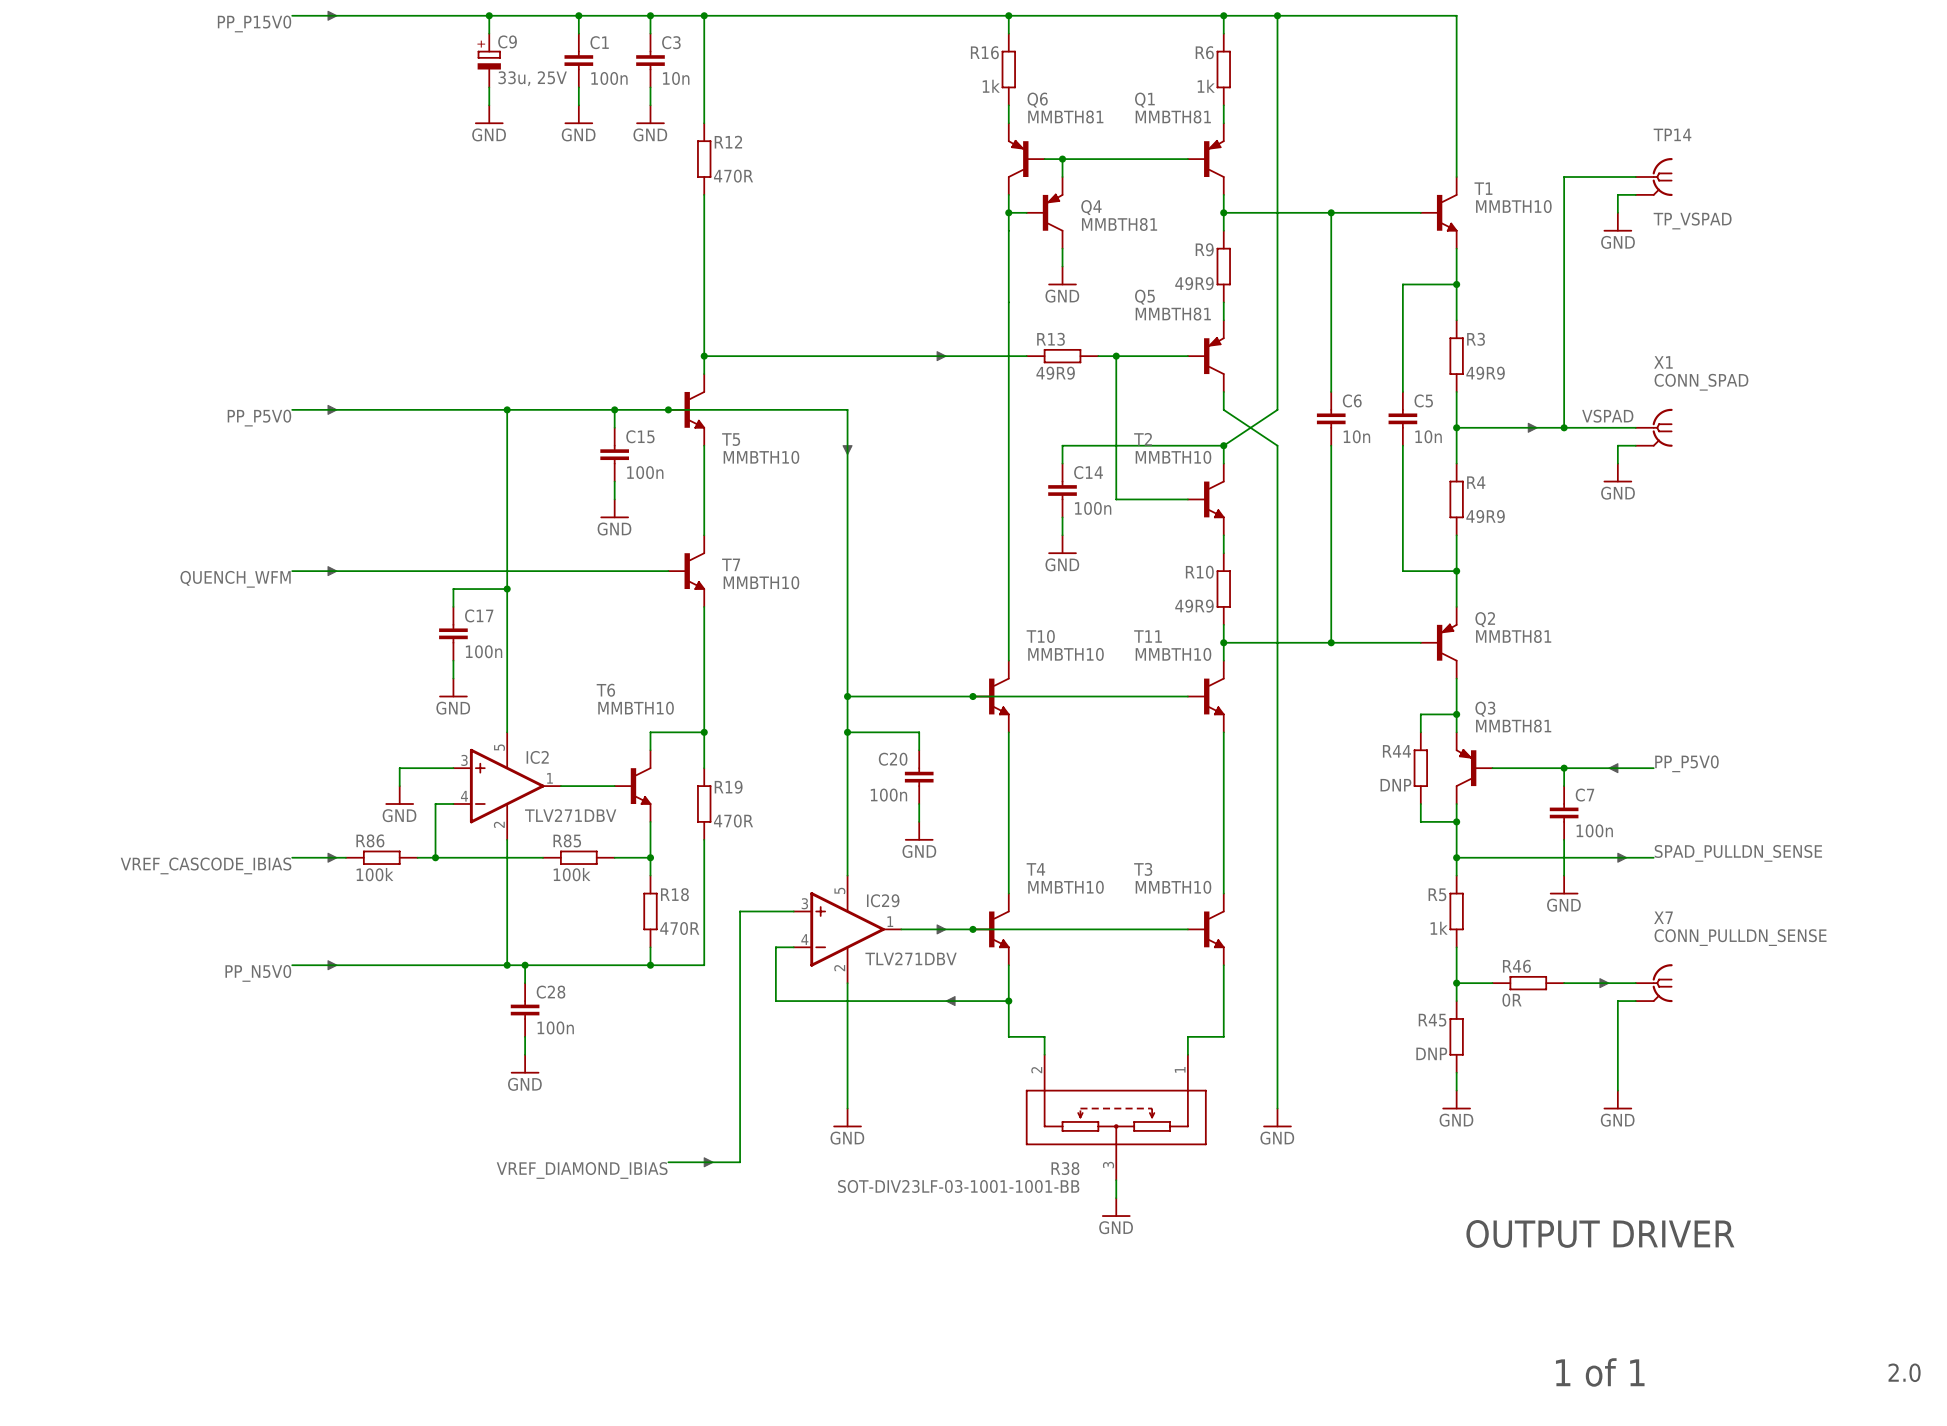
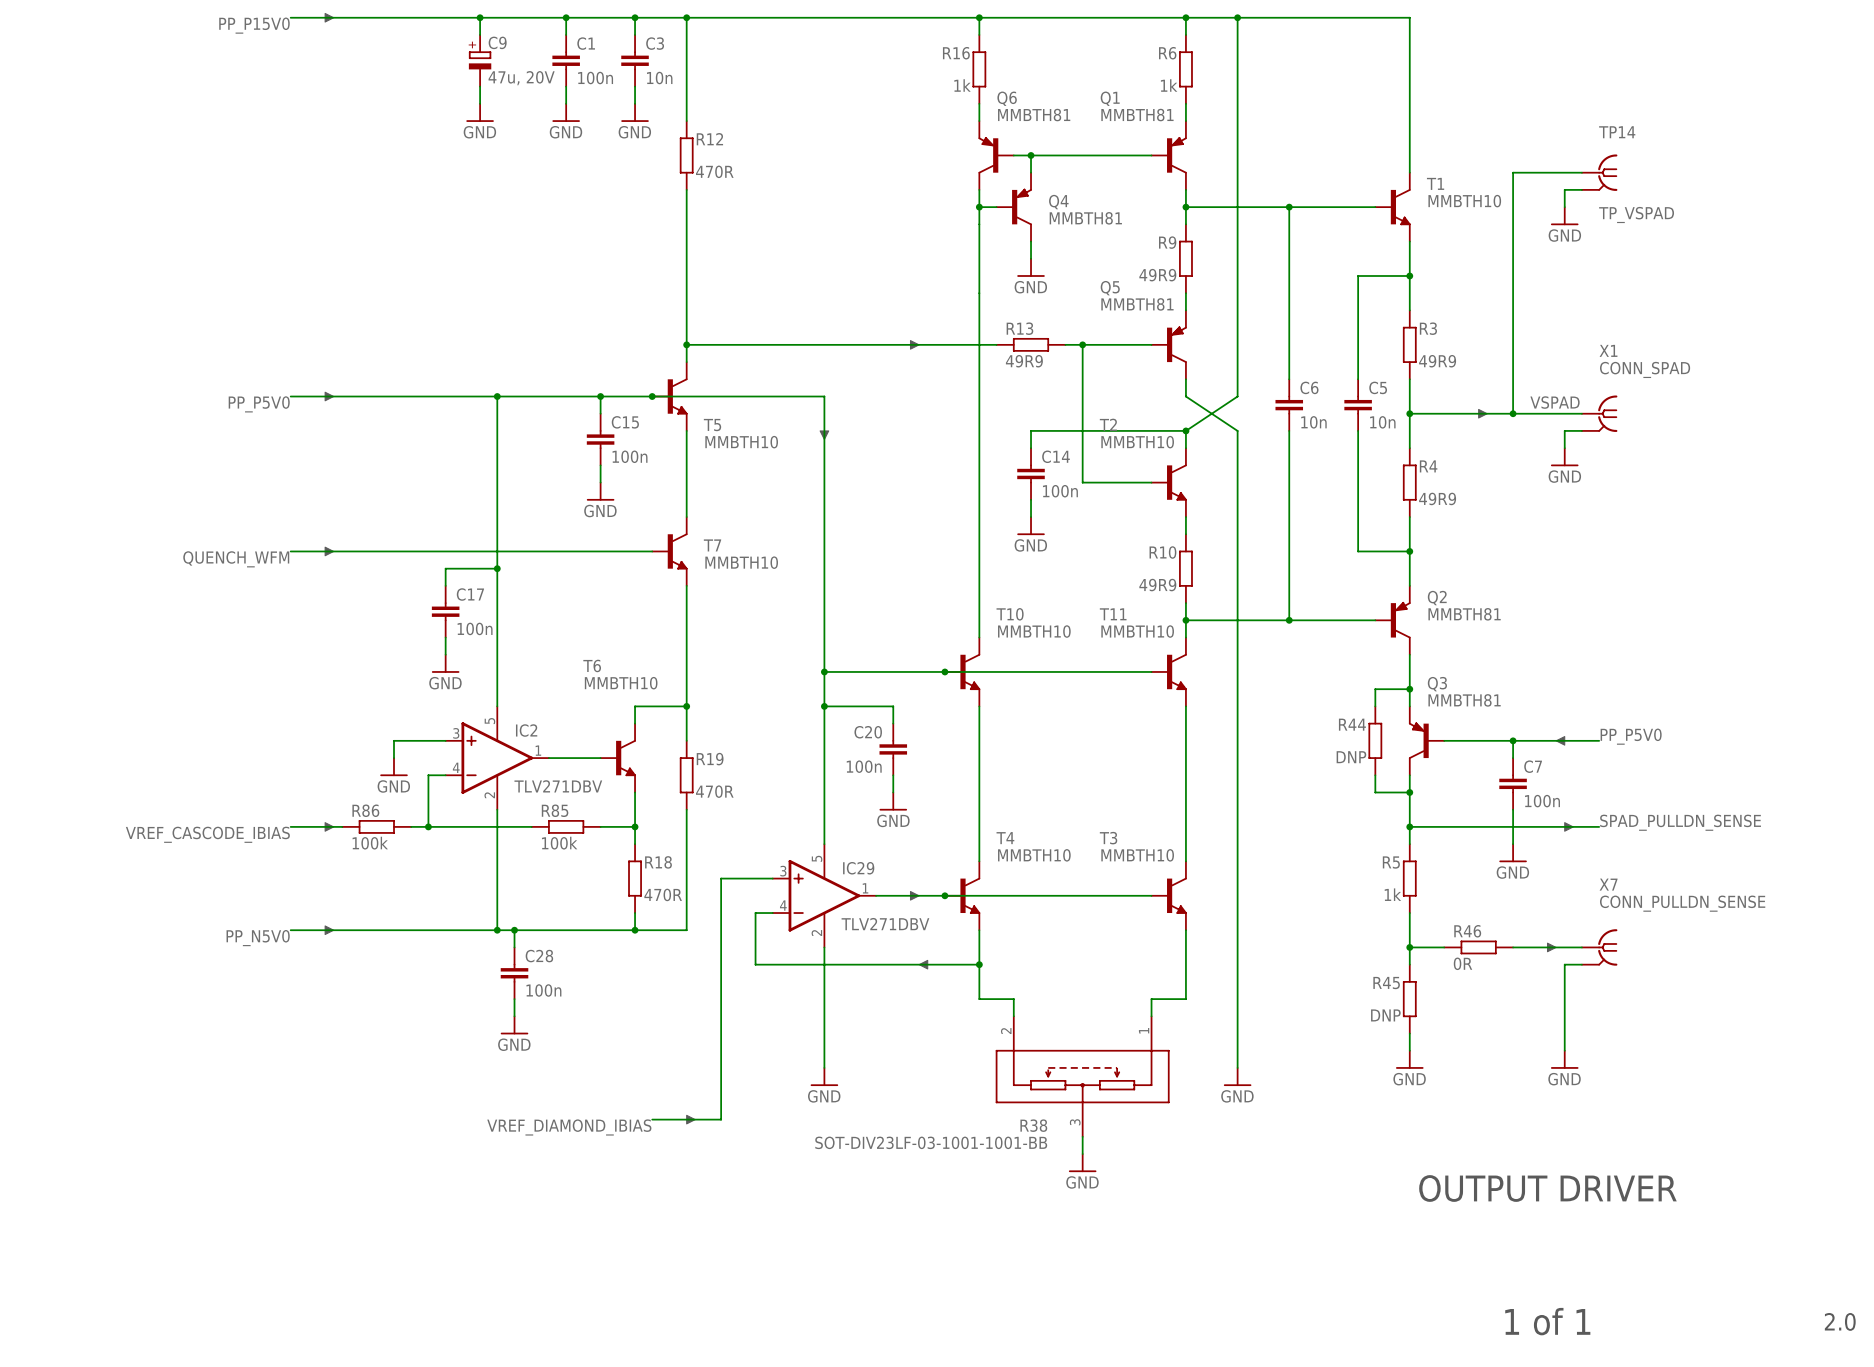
C9 value: 33u, 25V (532, 78) -> 47u, 20V (521, 78)

